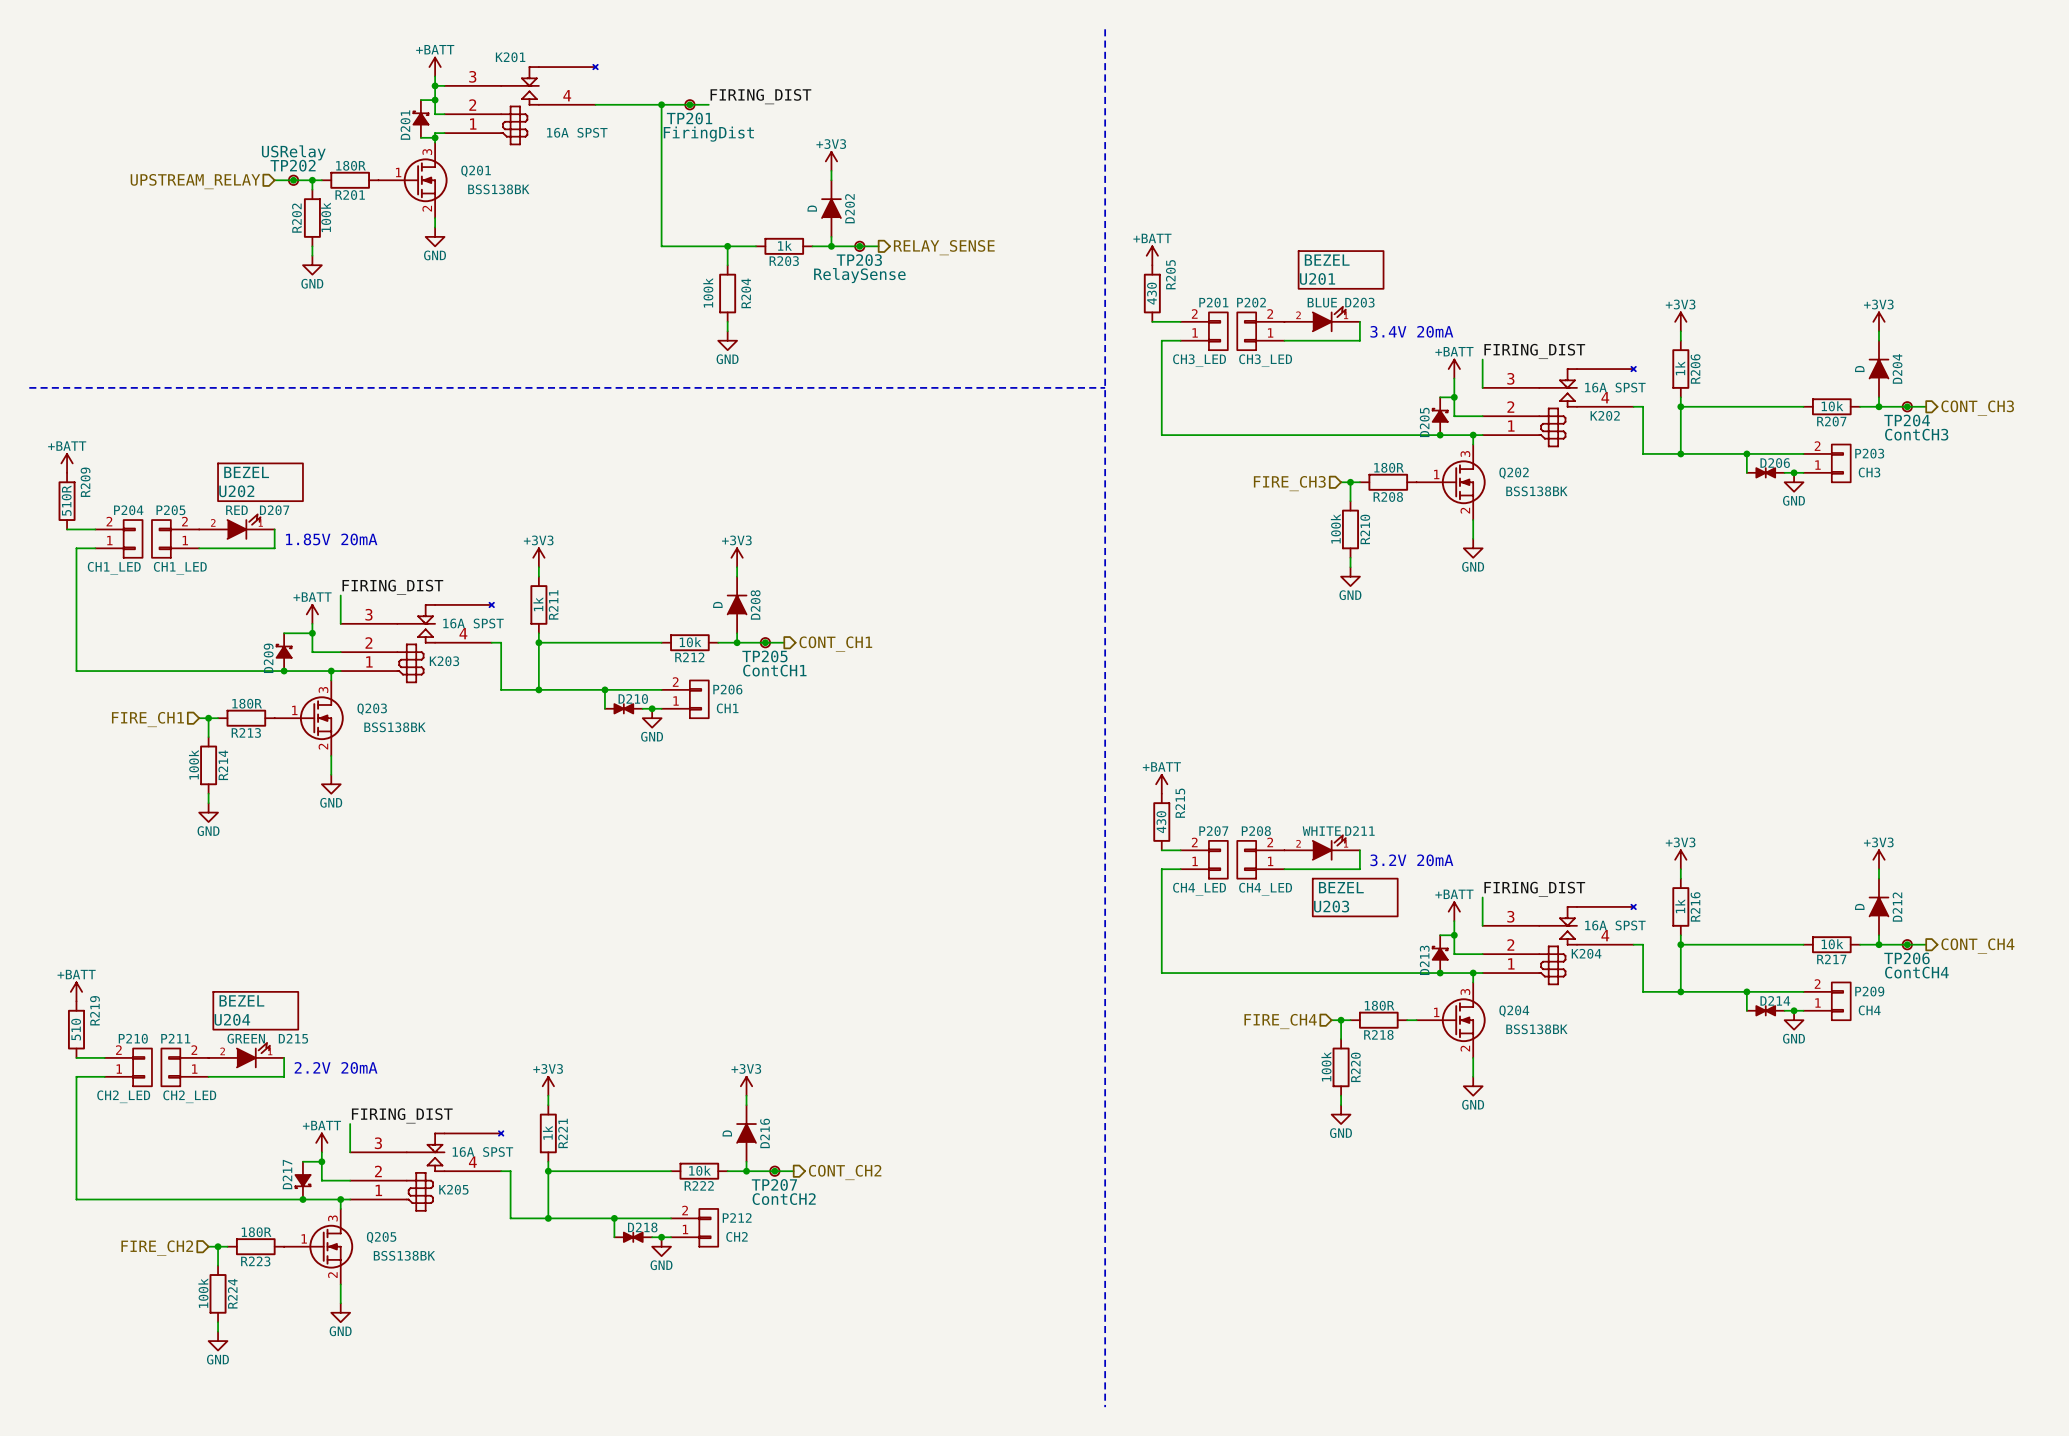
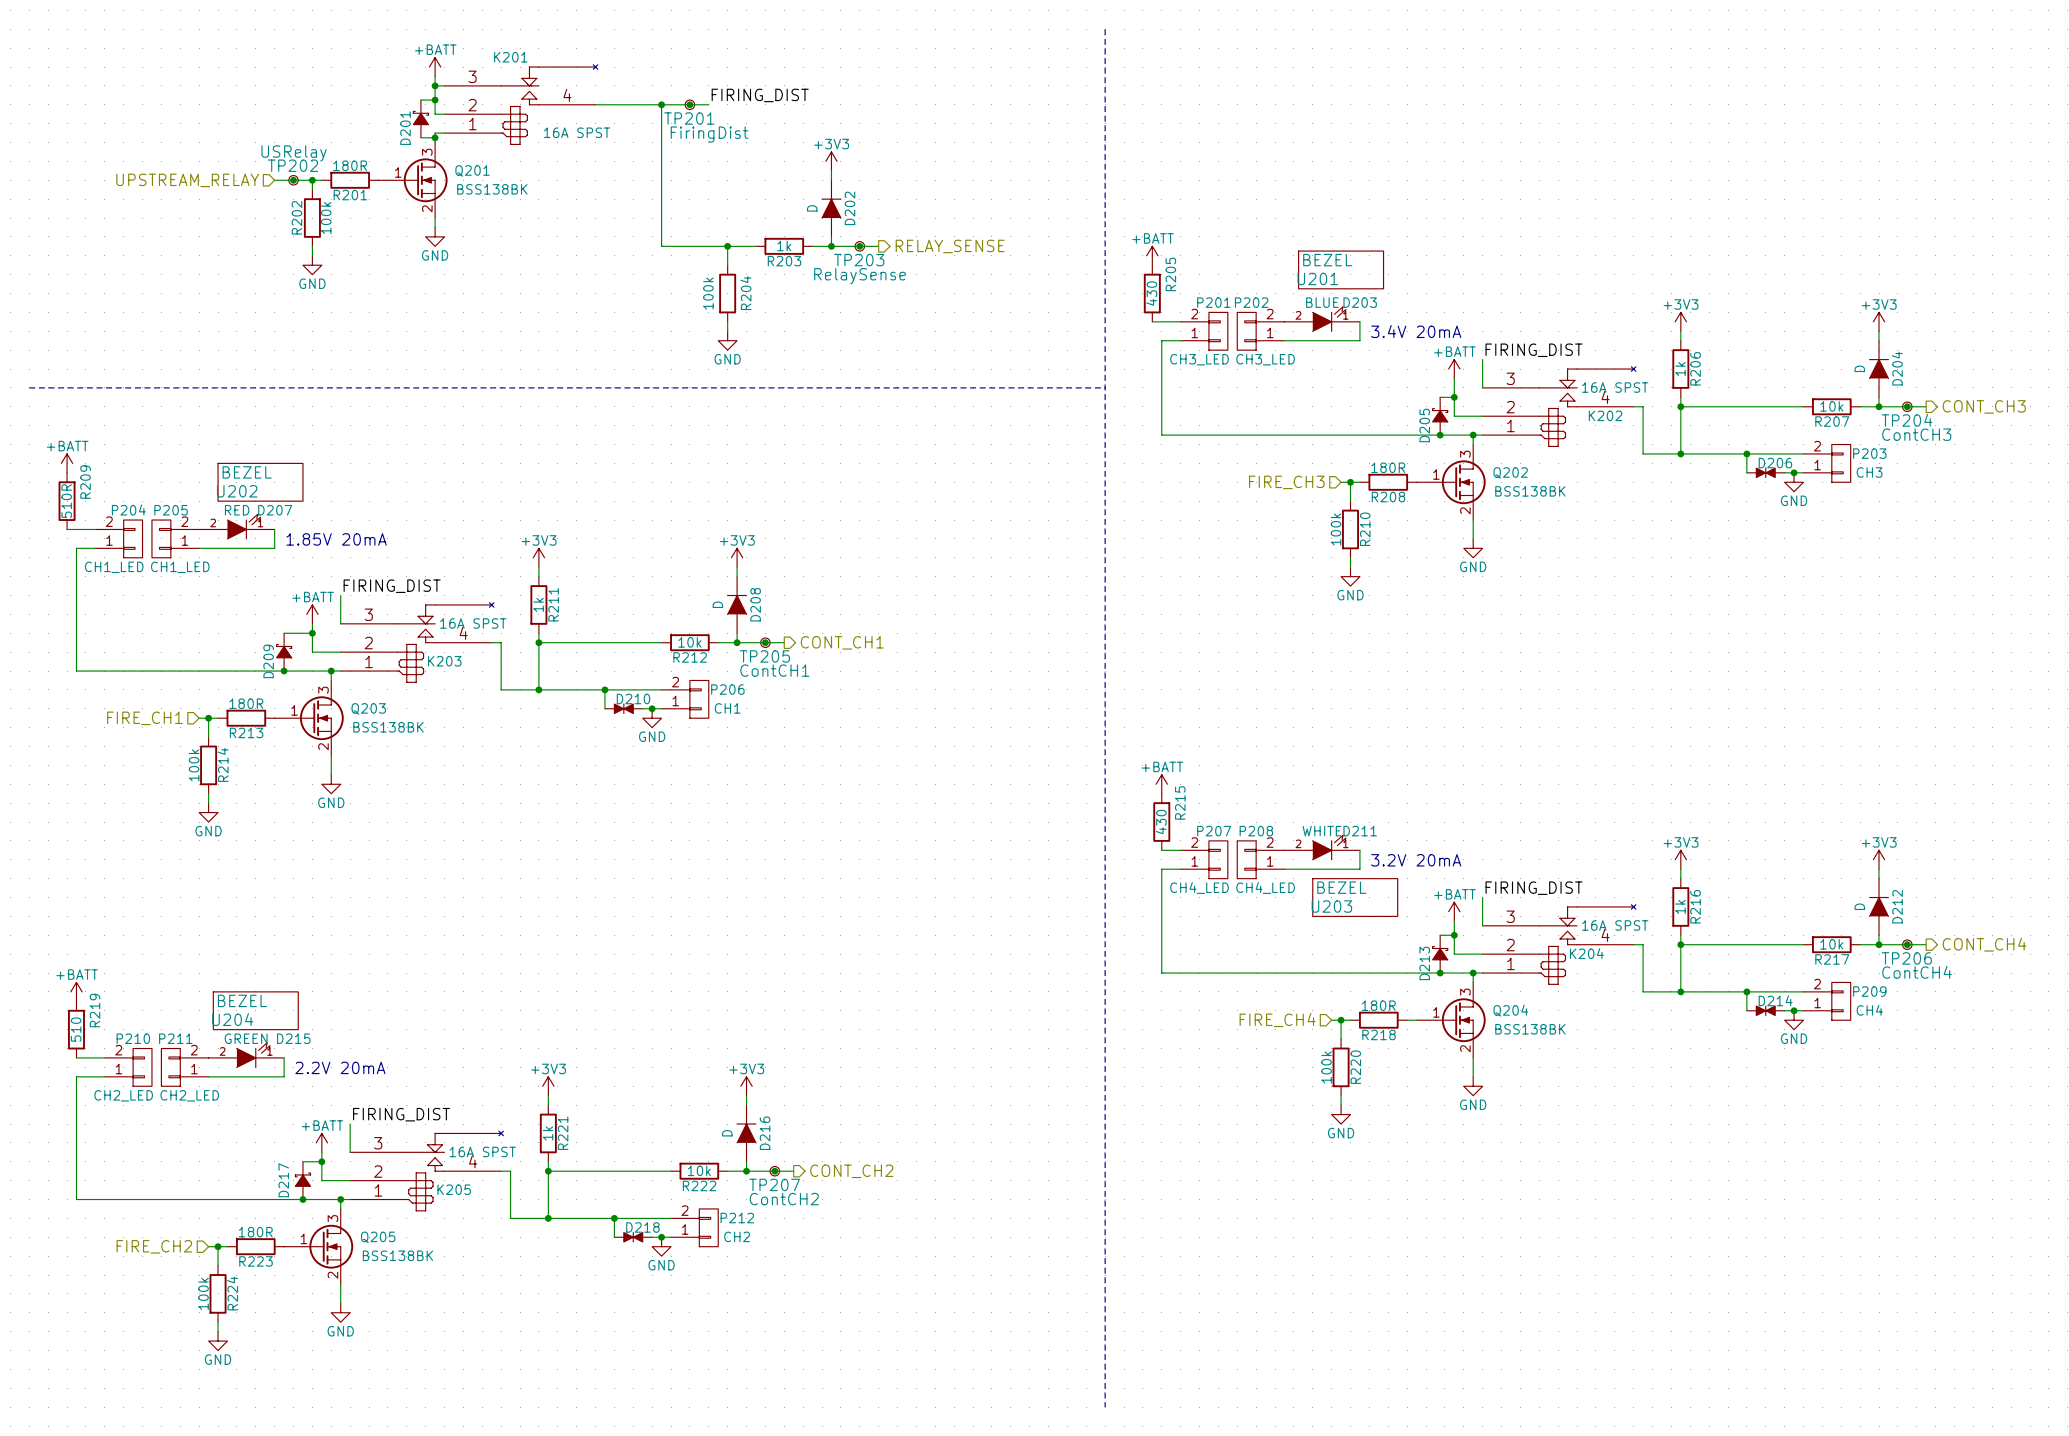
D217 rotation: 0° (302, 1181) -> 180° (302, 1179)

